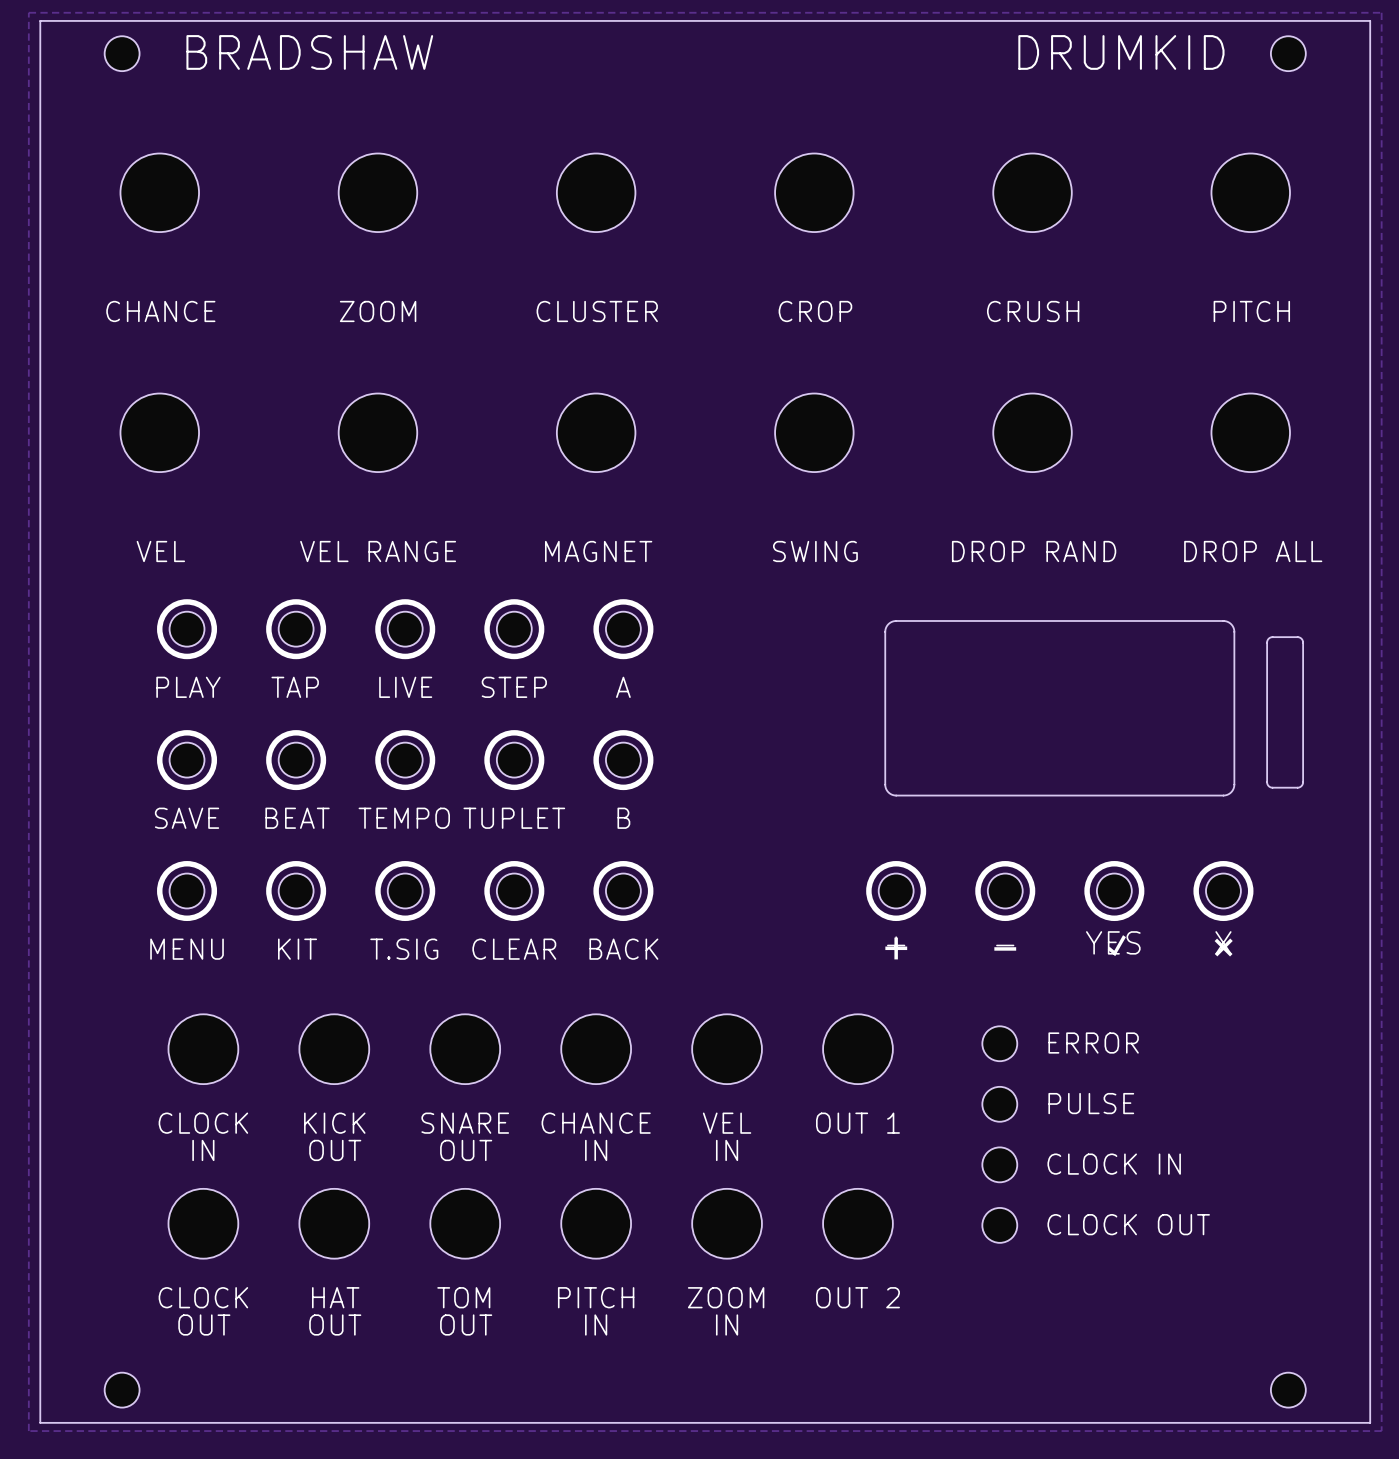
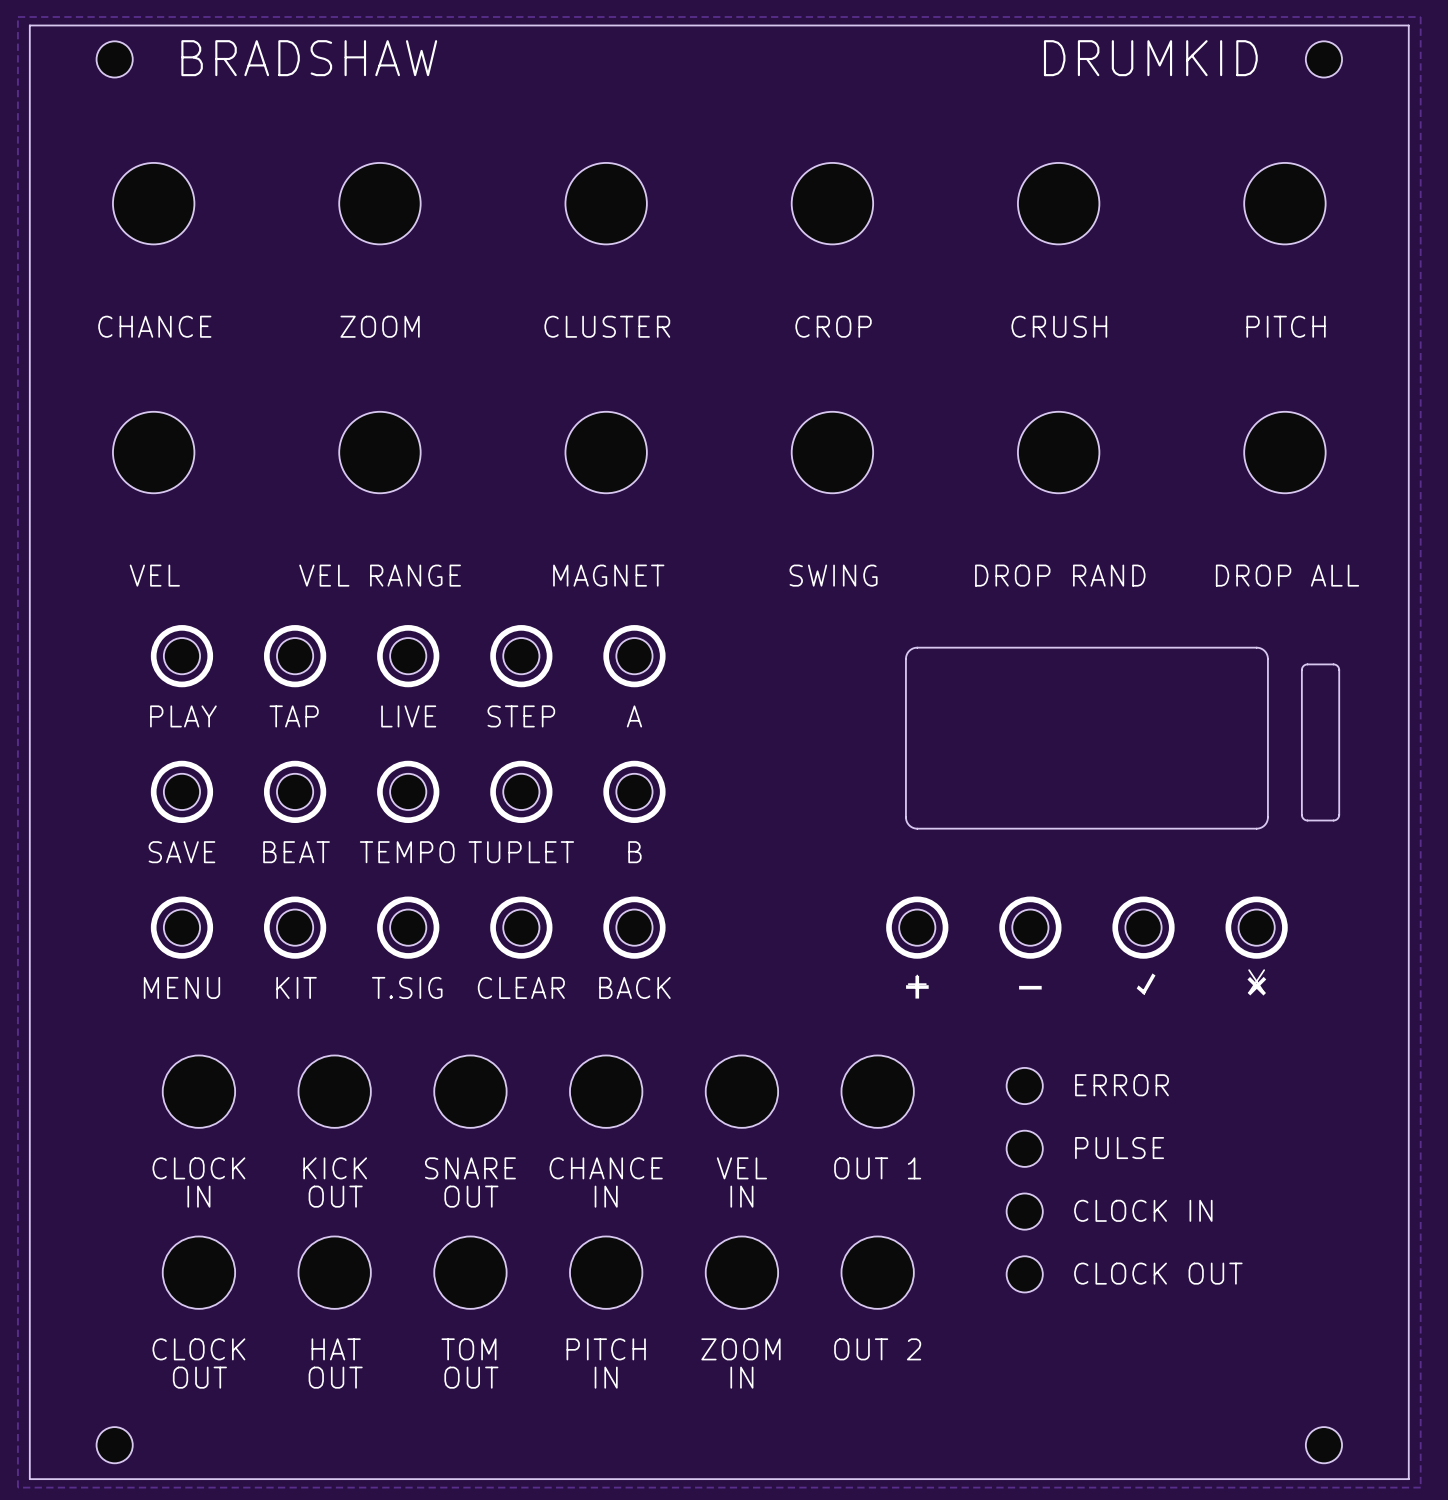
part value: YES (1113, 942) -> none
part value: - (1005, 945) -> none

